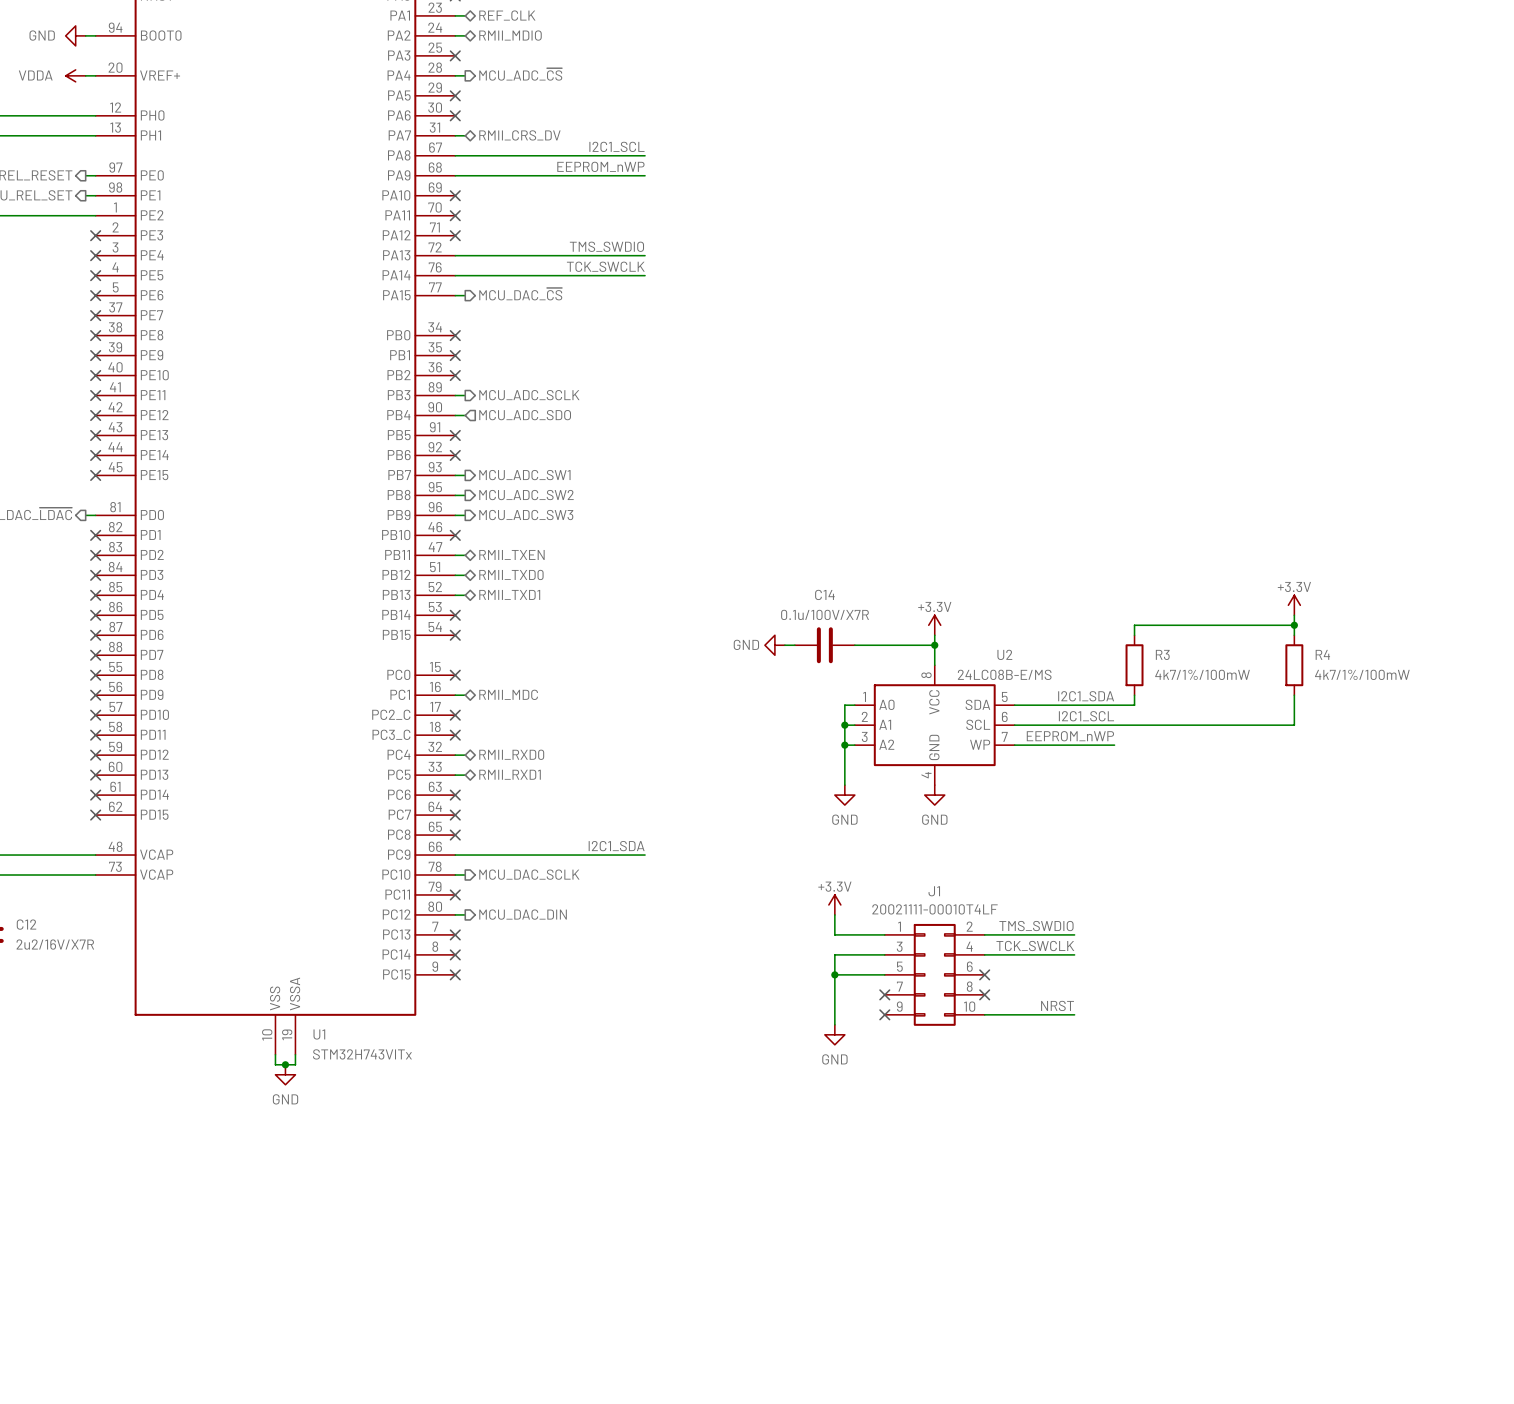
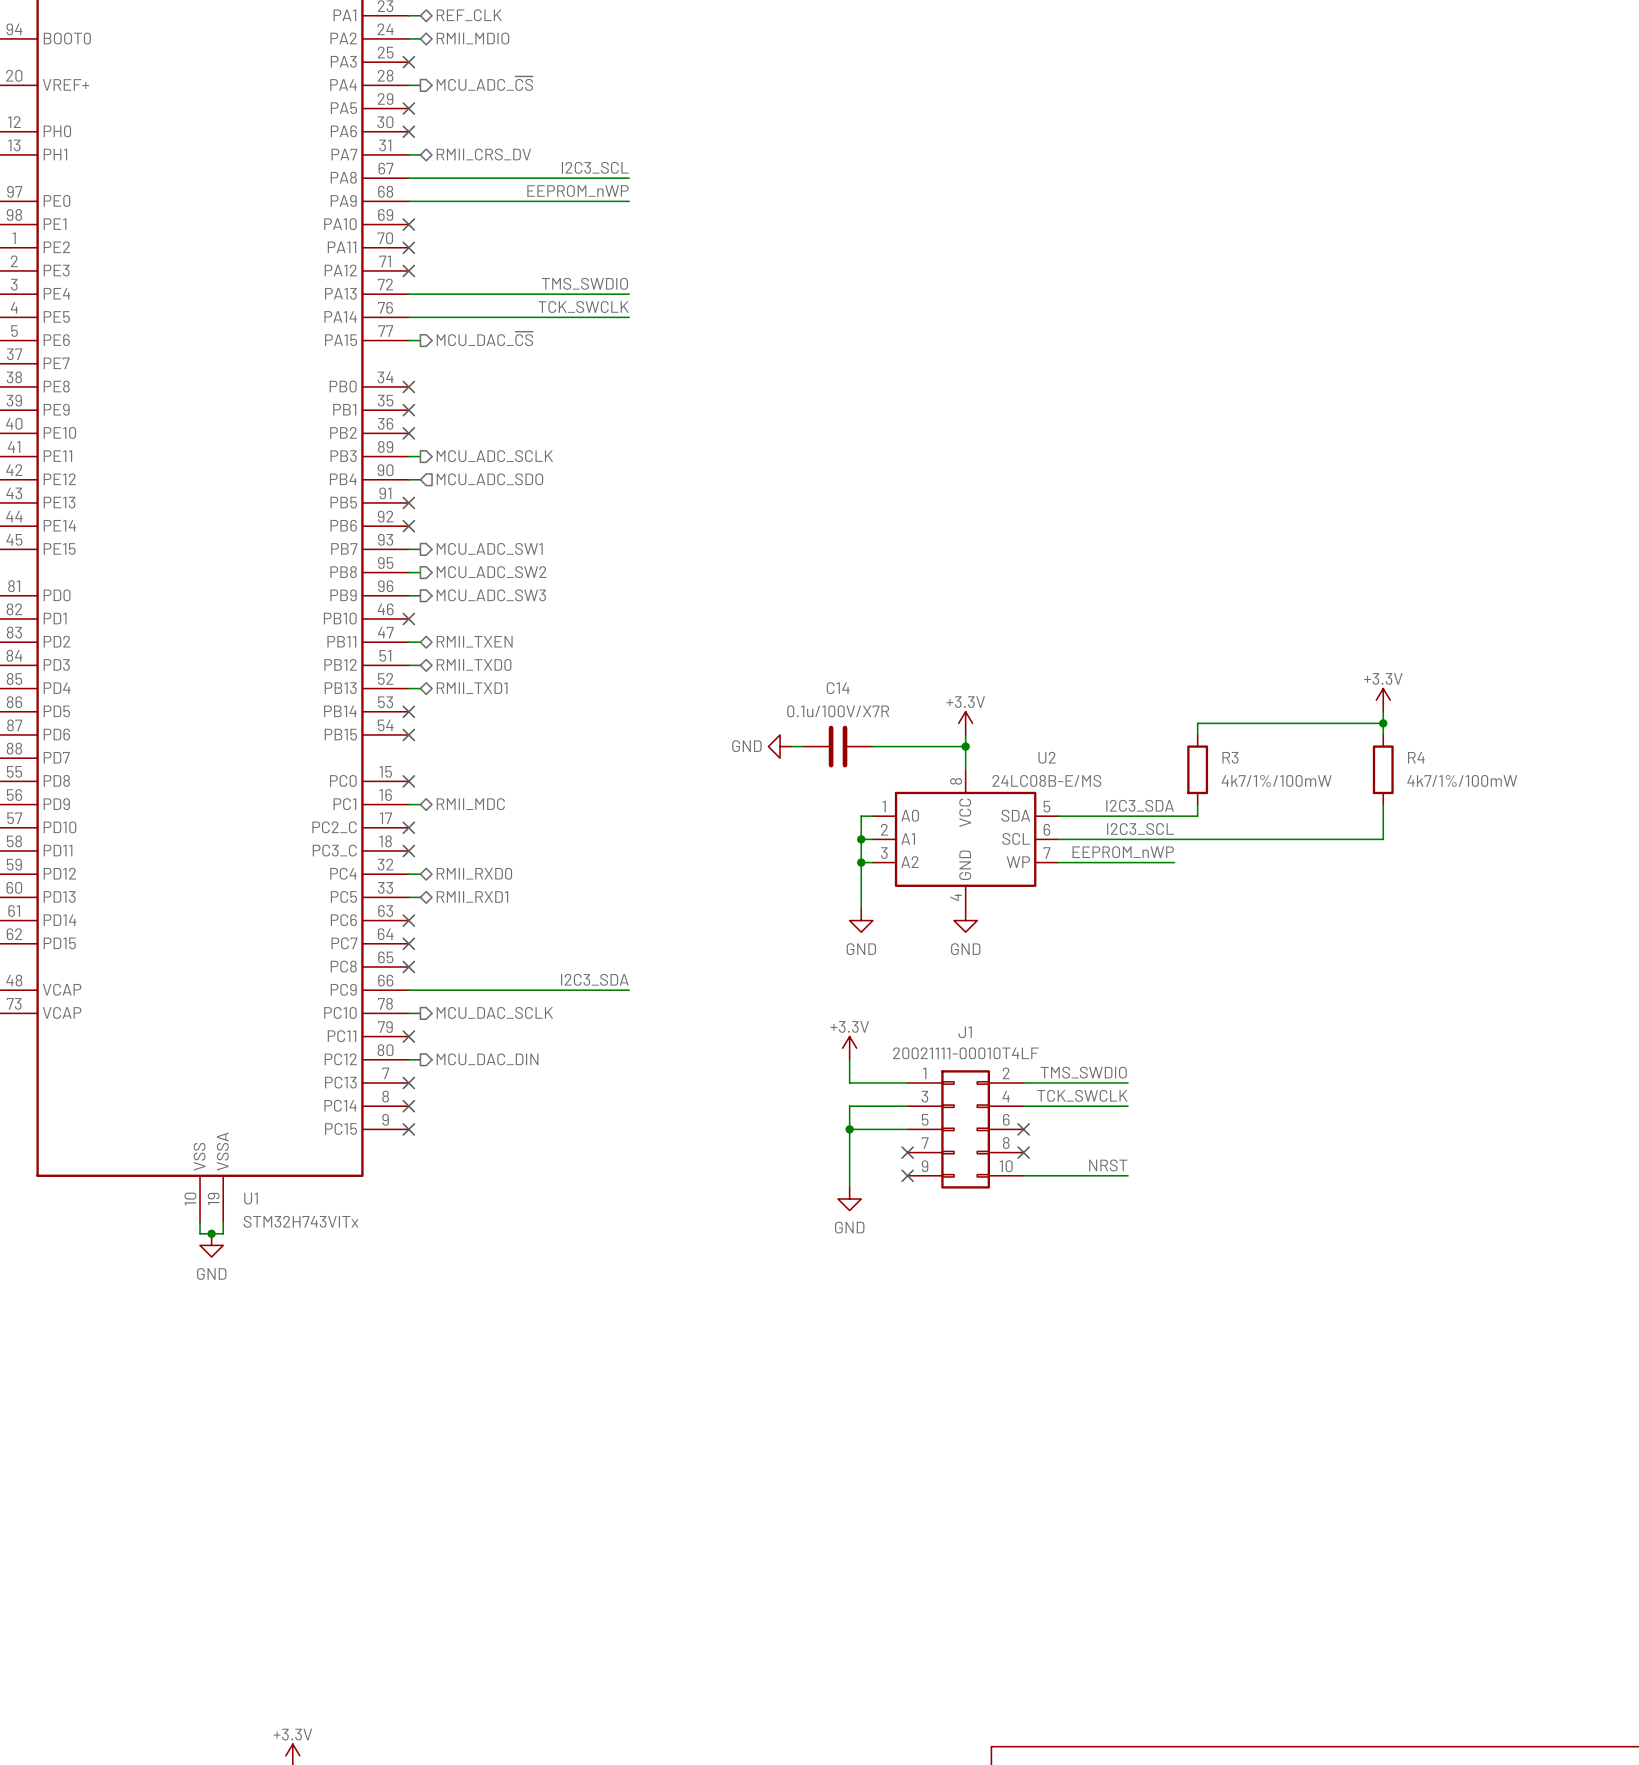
label: I2C1_SCL (616, 146) -> I2C3_SCL (595, 167)
label: I2C1_SDA (1086, 696) -> I2C3_SDA (1140, 805)
label: I2C1_SCL (1086, 716) -> I2C3_SCL (1140, 829)
label: I2C1_SDA (616, 846) -> I2C3_SDA (594, 979)

